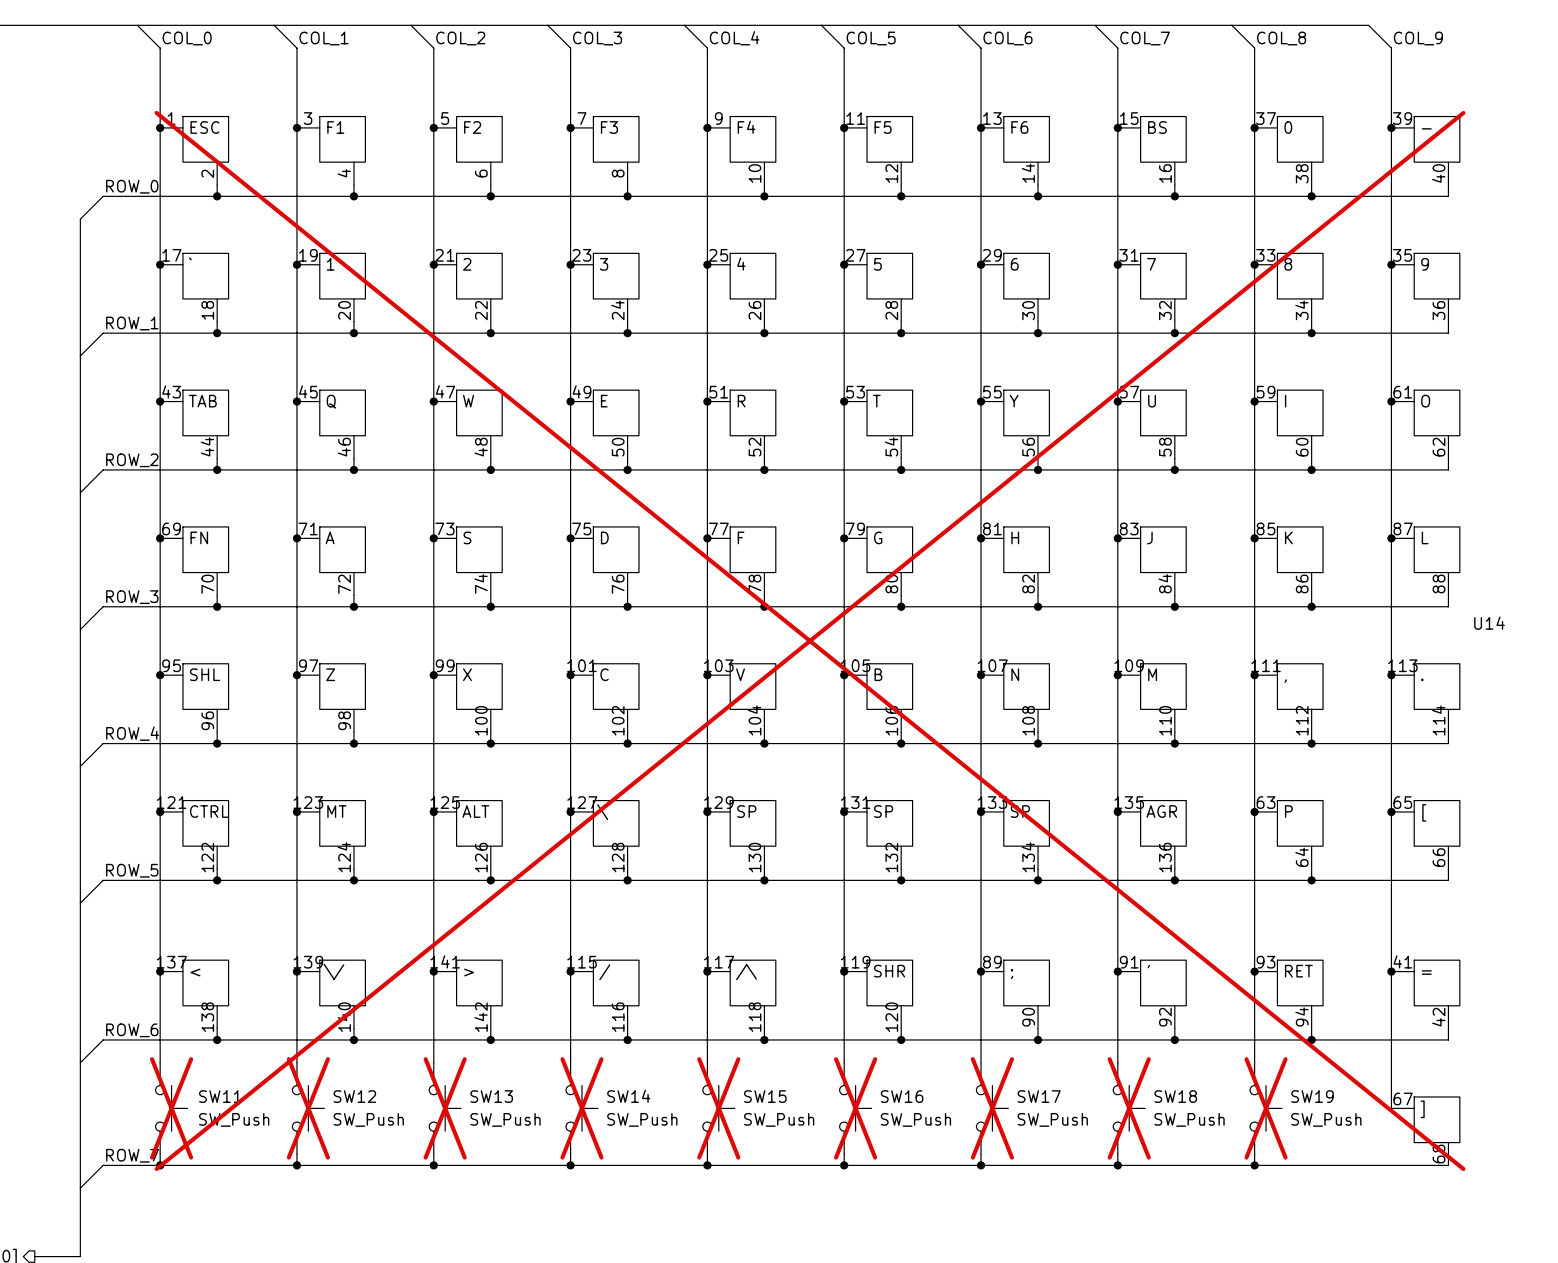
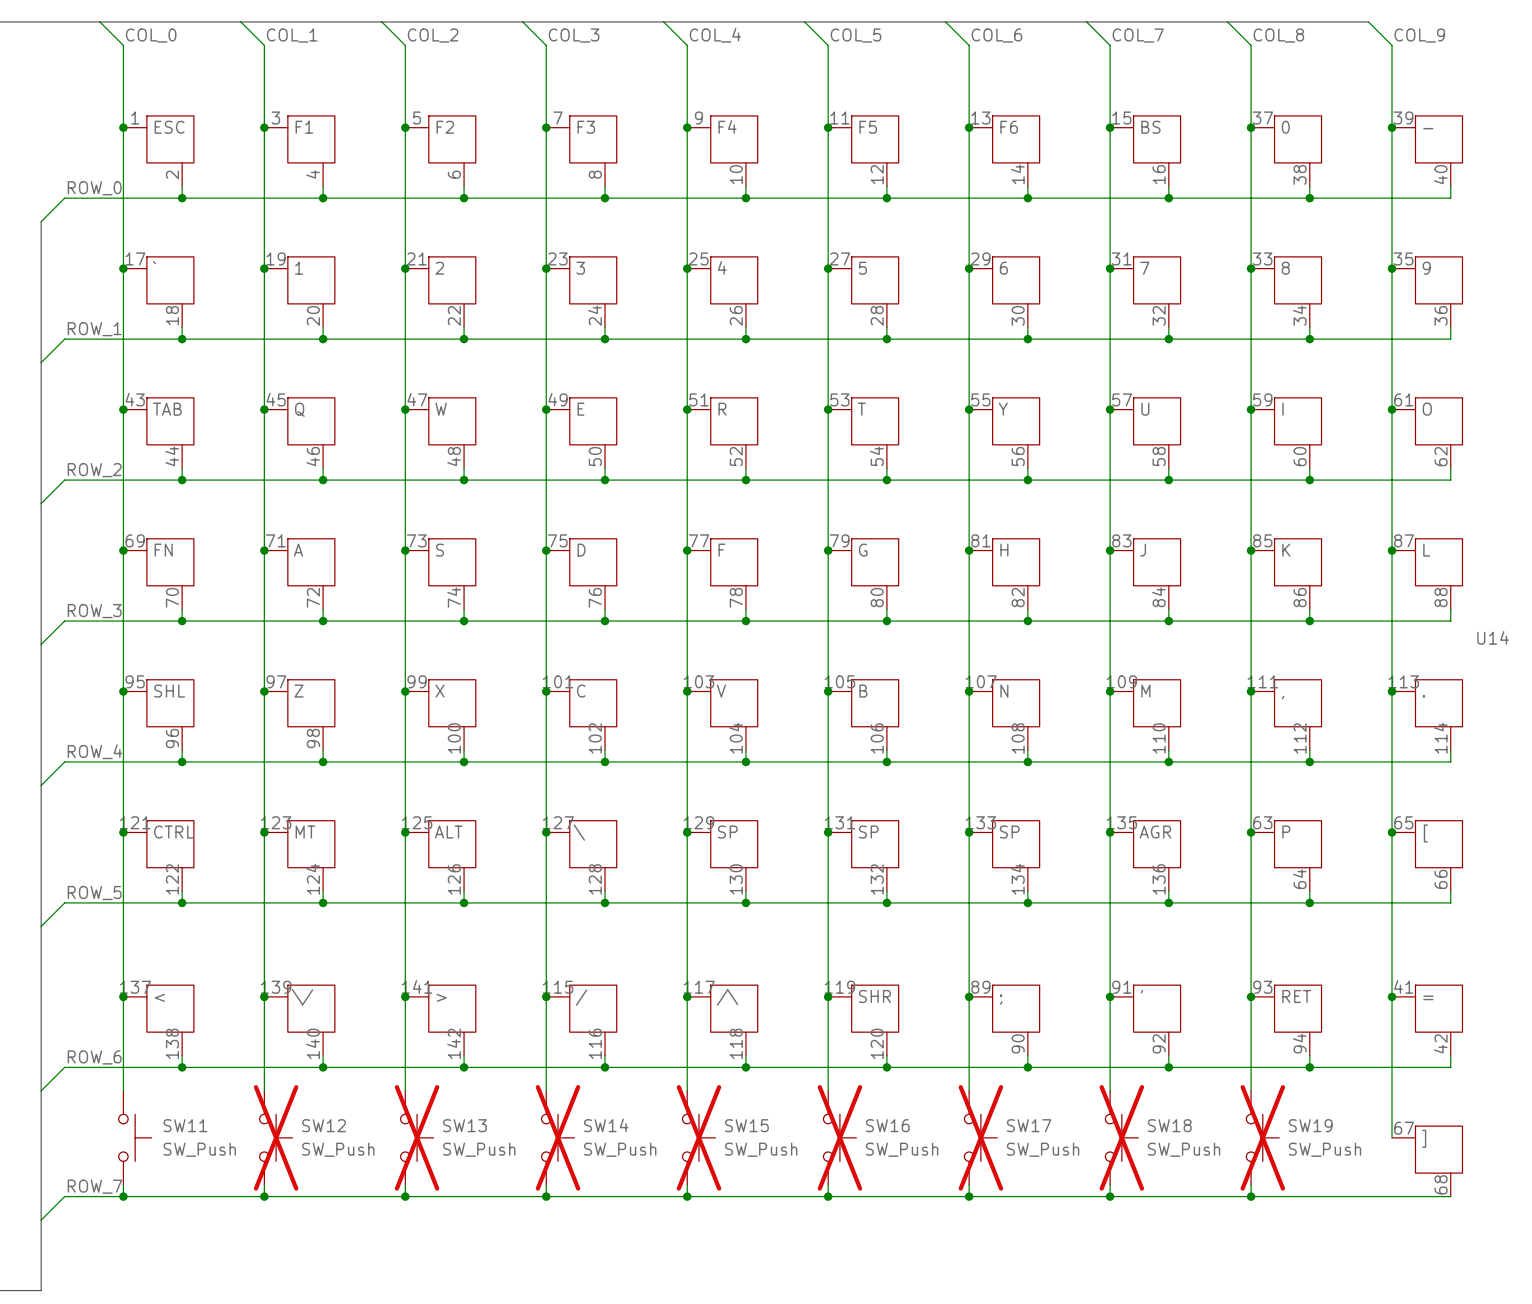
U14 do-not-place cross: (810, 640) -> none
SW11 do-not-place cross: (171, 1108) -> none

